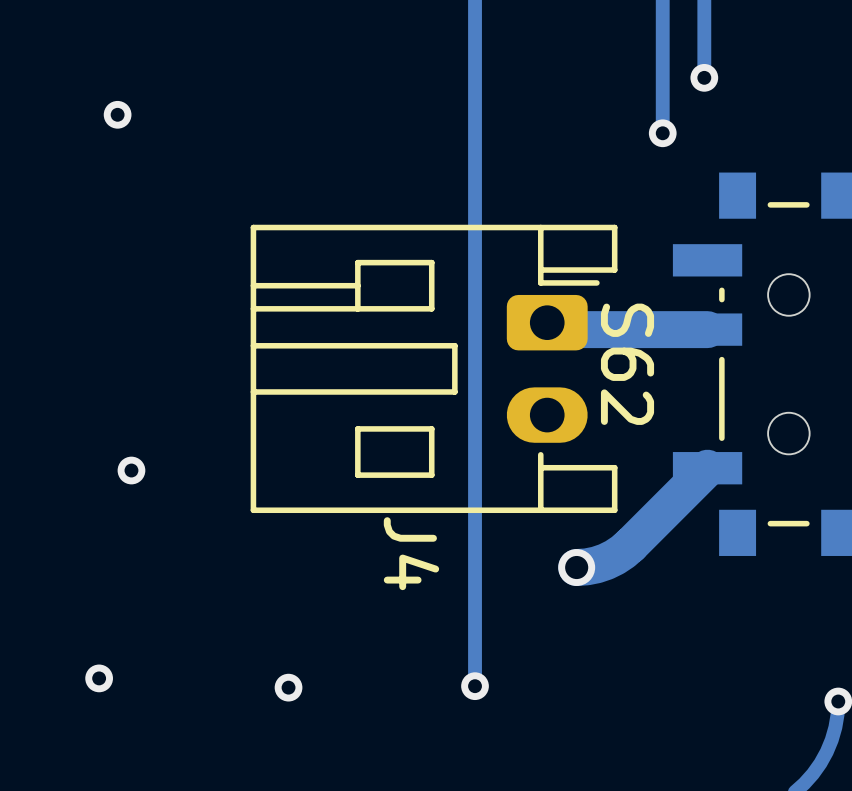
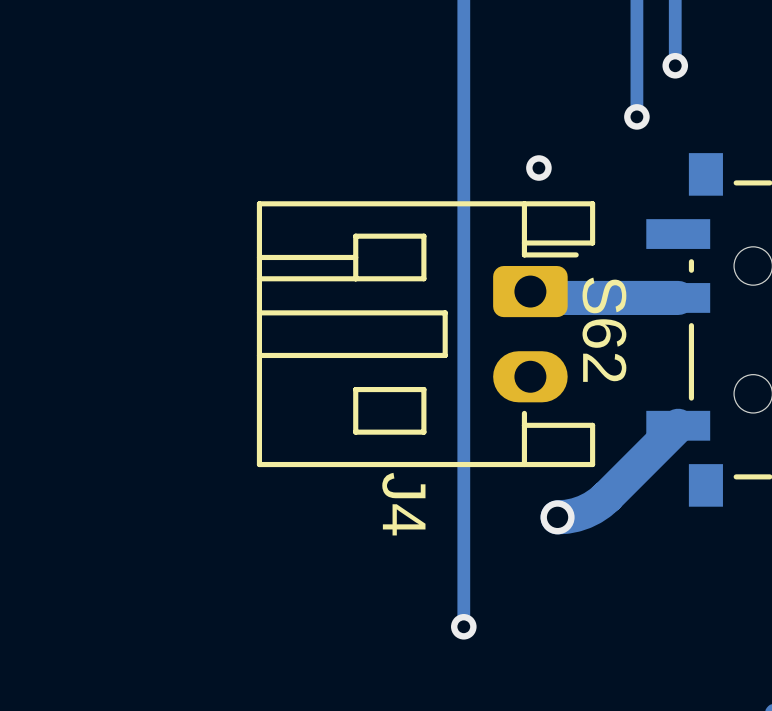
via: (117, 114) -> none
via: none -> (538, 168)
via: (131, 470) -> none
via: (99, 678) -> none
via: (288, 687) -> none

